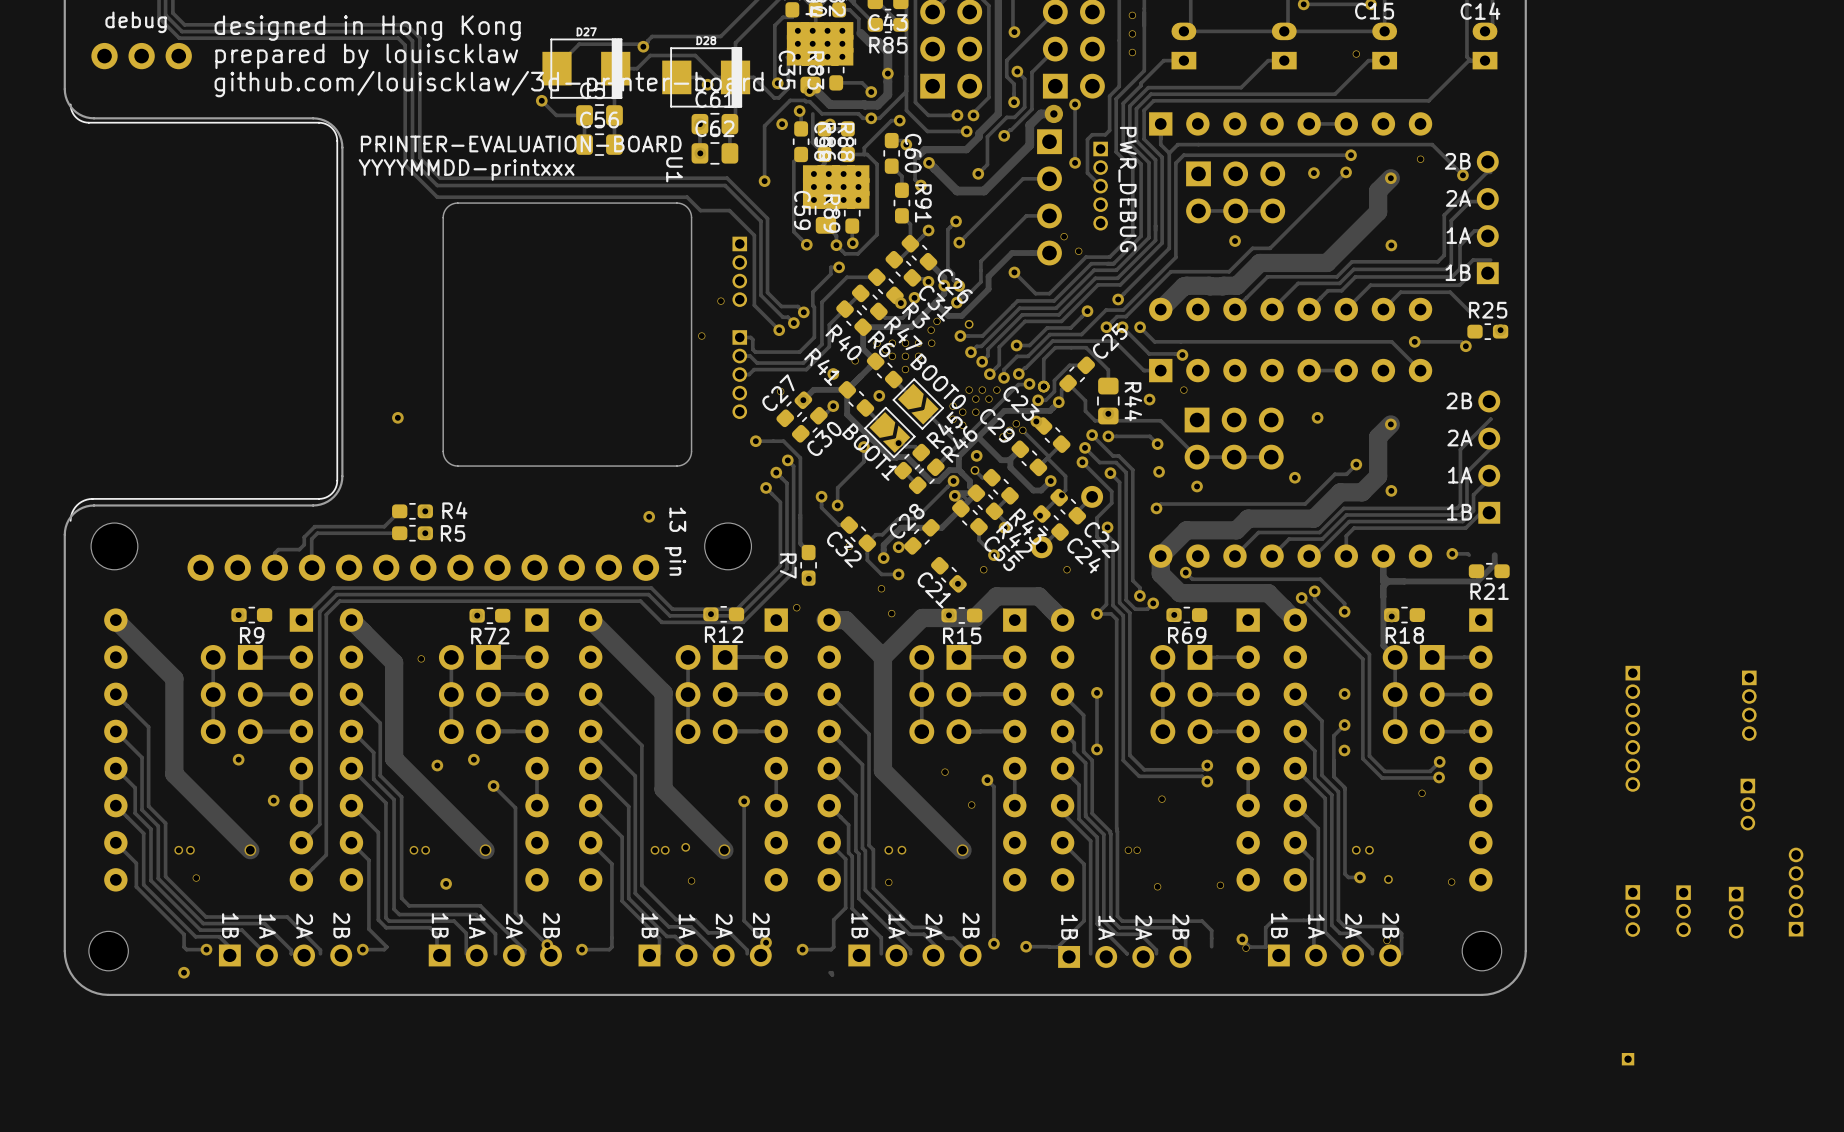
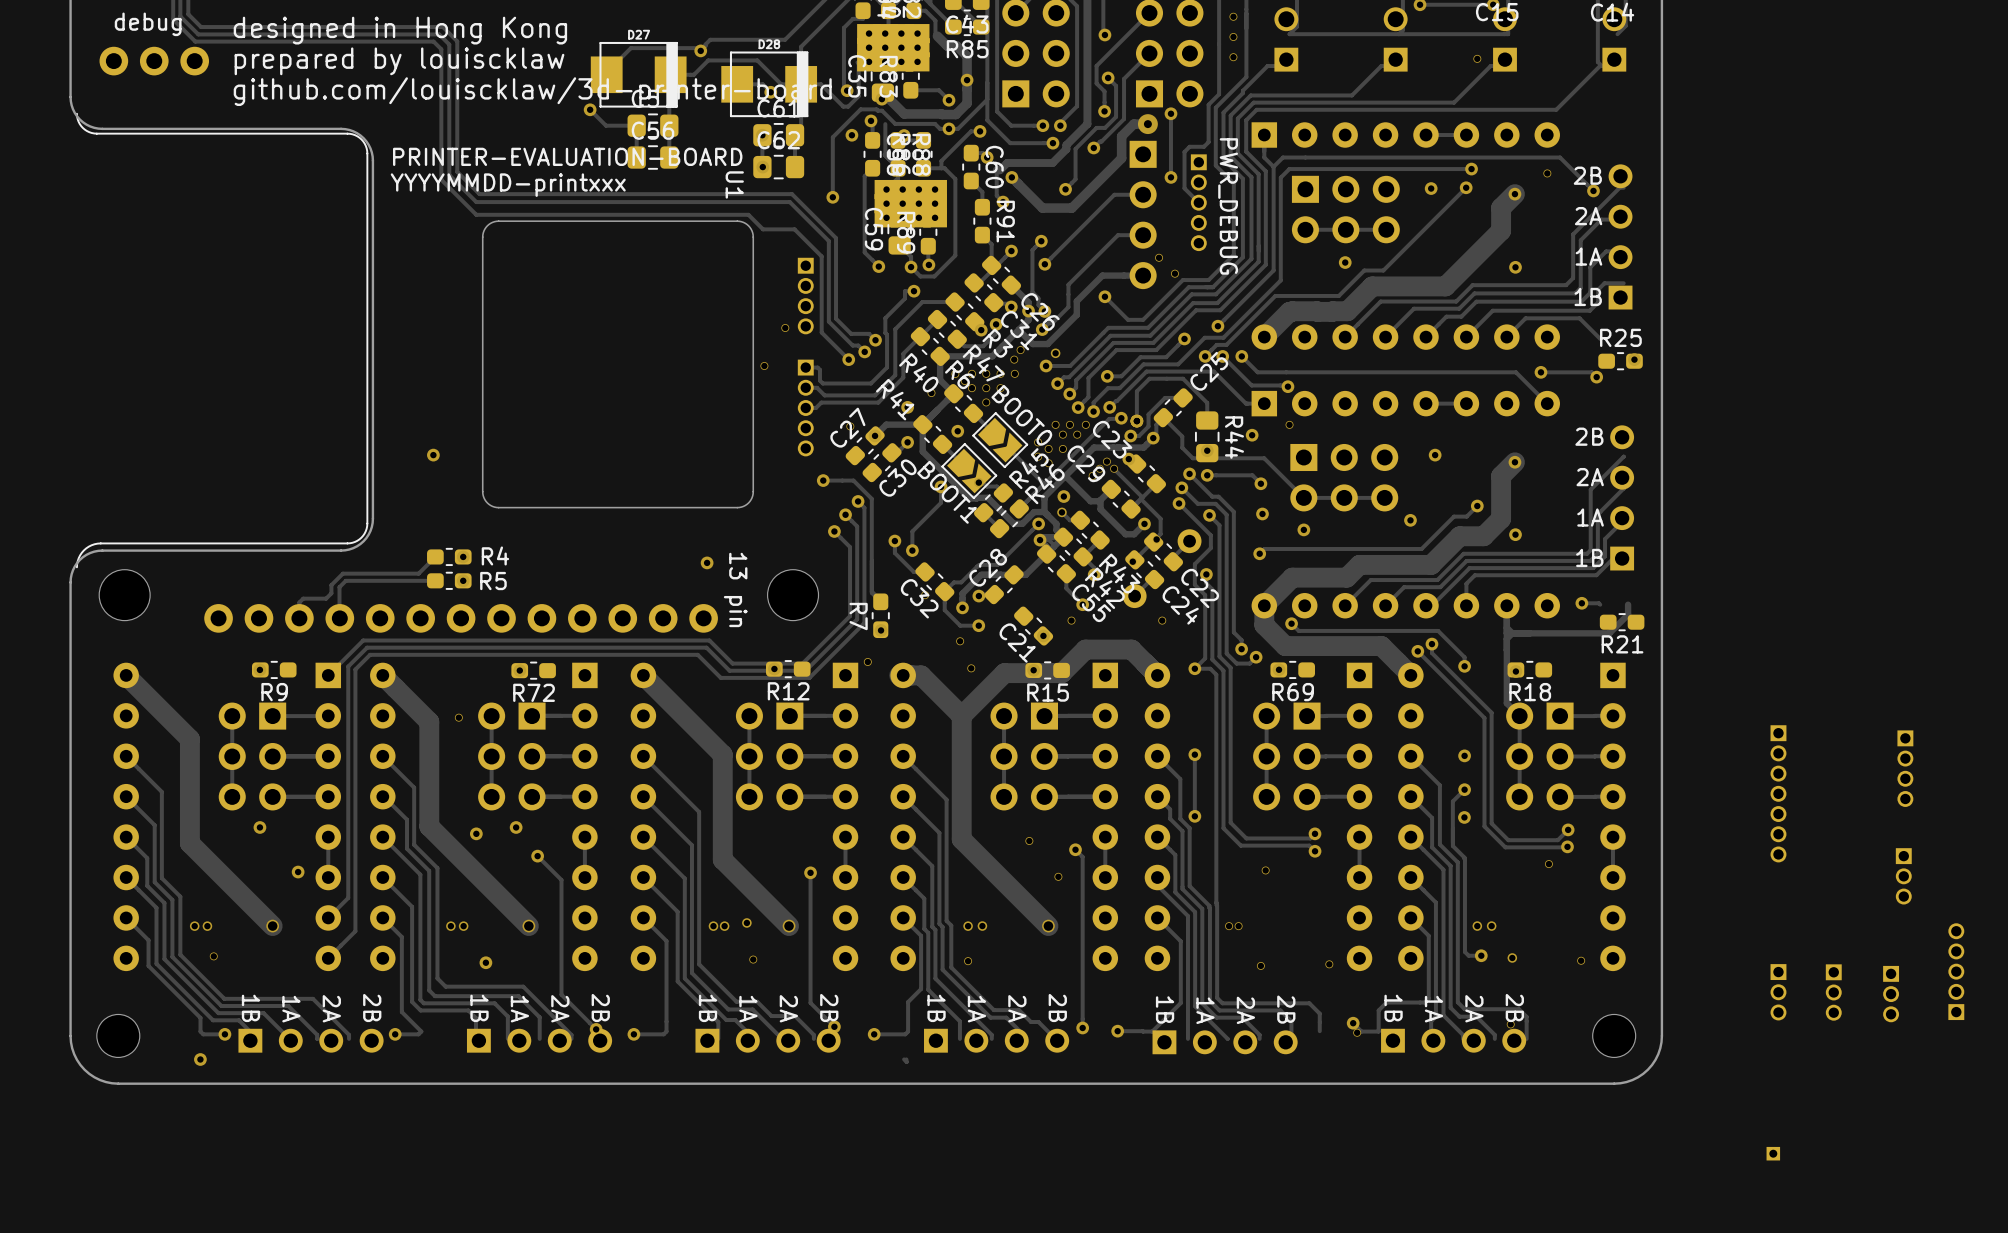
part footprint: [1171, 22, 1197, 70] -> [1274, 7, 1299, 72]
part footprint: [1271, 22, 1297, 70] -> [1383, 7, 1408, 72]
part footprint: [1372, 22, 1398, 70] -> [1493, 7, 1517, 72]
part footprint: [1472, 22, 1498, 70] -> [1602, 7, 1627, 72]

